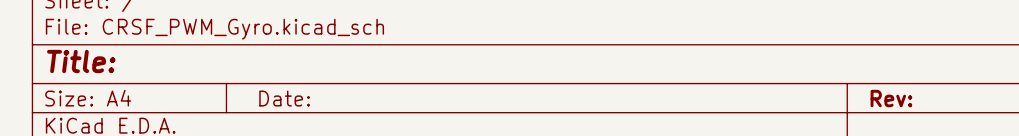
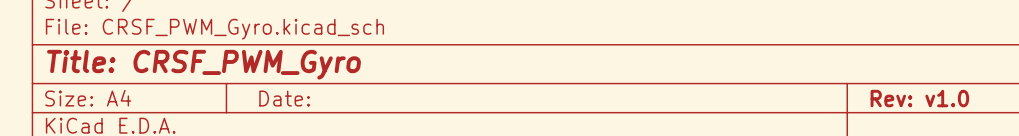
title block: Title: (81, 61) -> Title: CRSF_PWM_Gyro (204, 64)
title block: Rev: (891, 98) -> Rev: v1.0 (919, 98)

